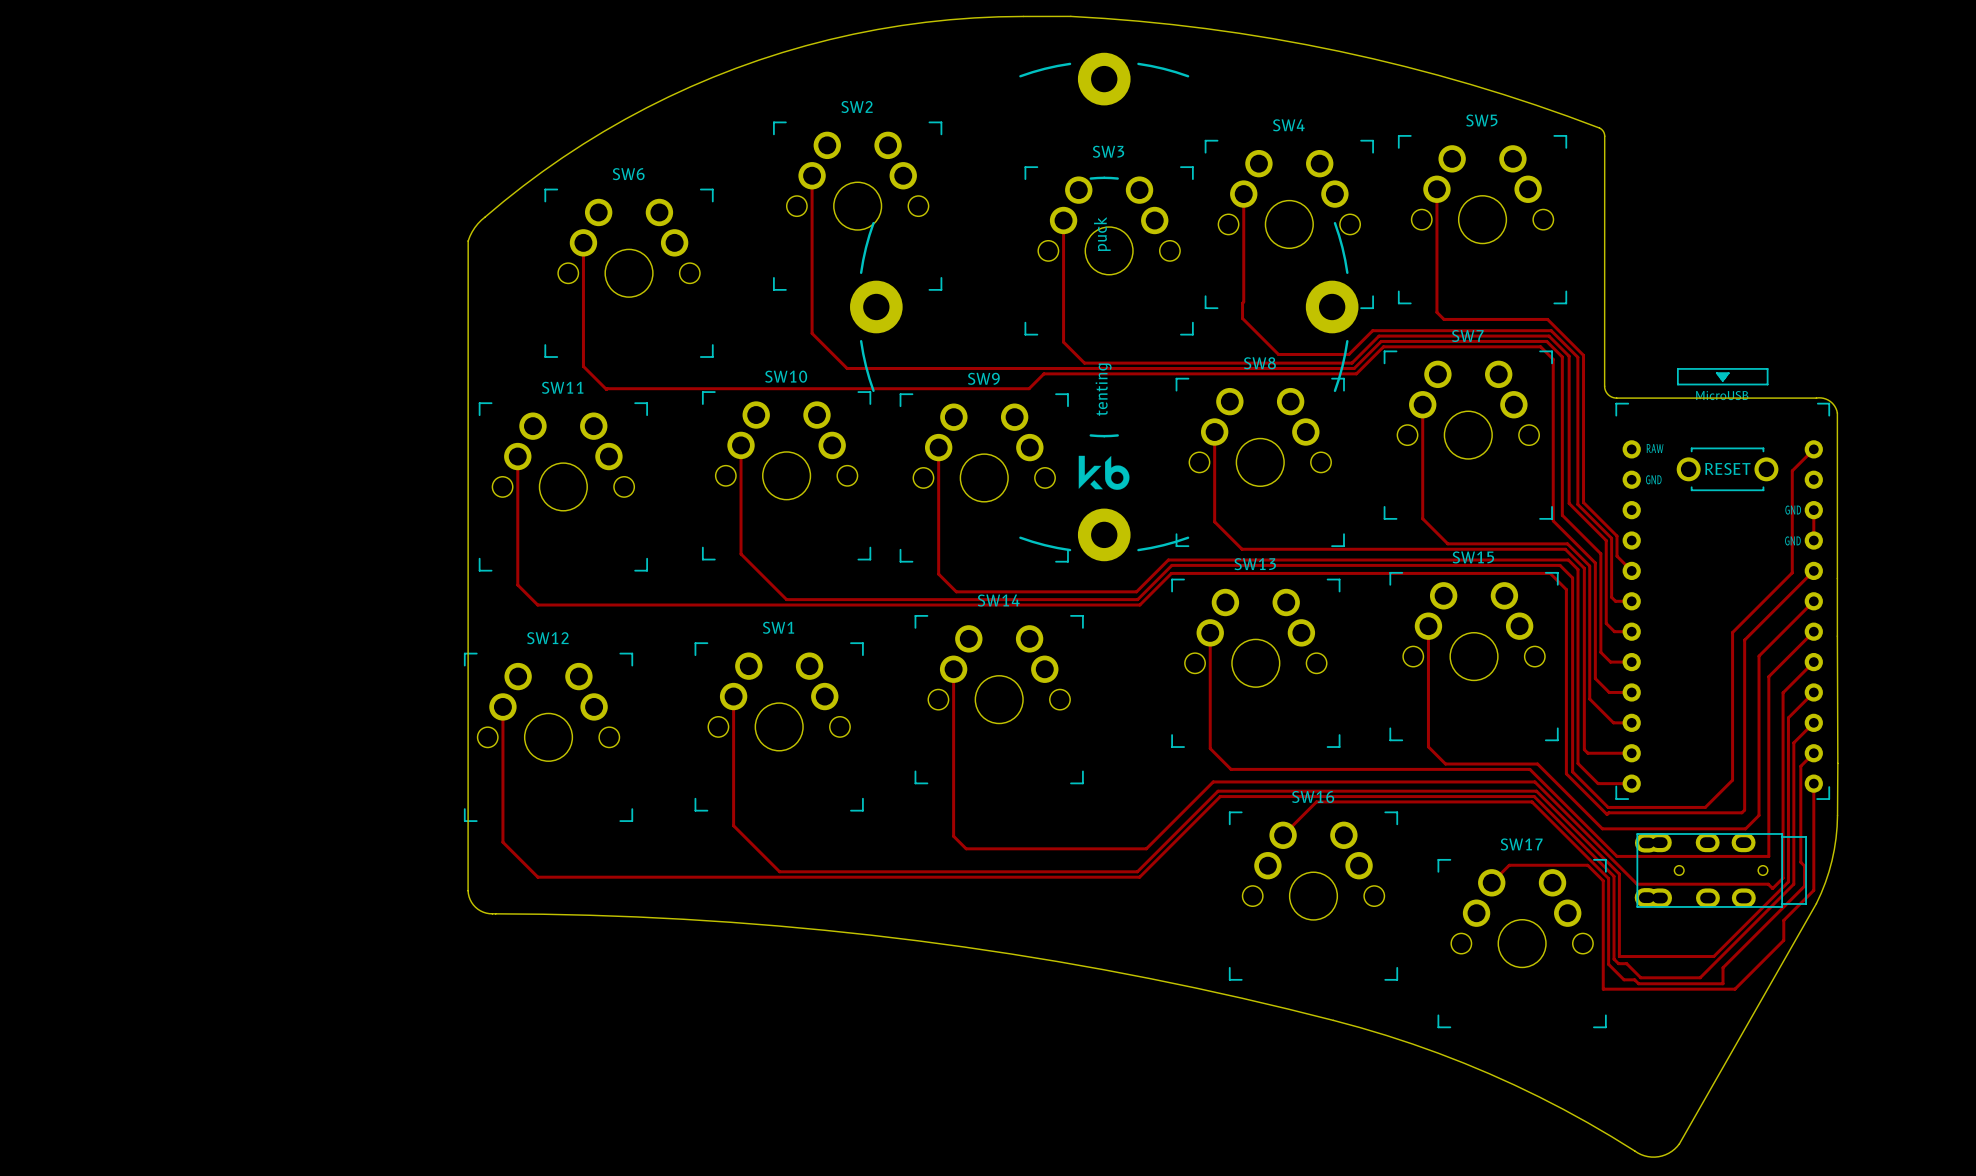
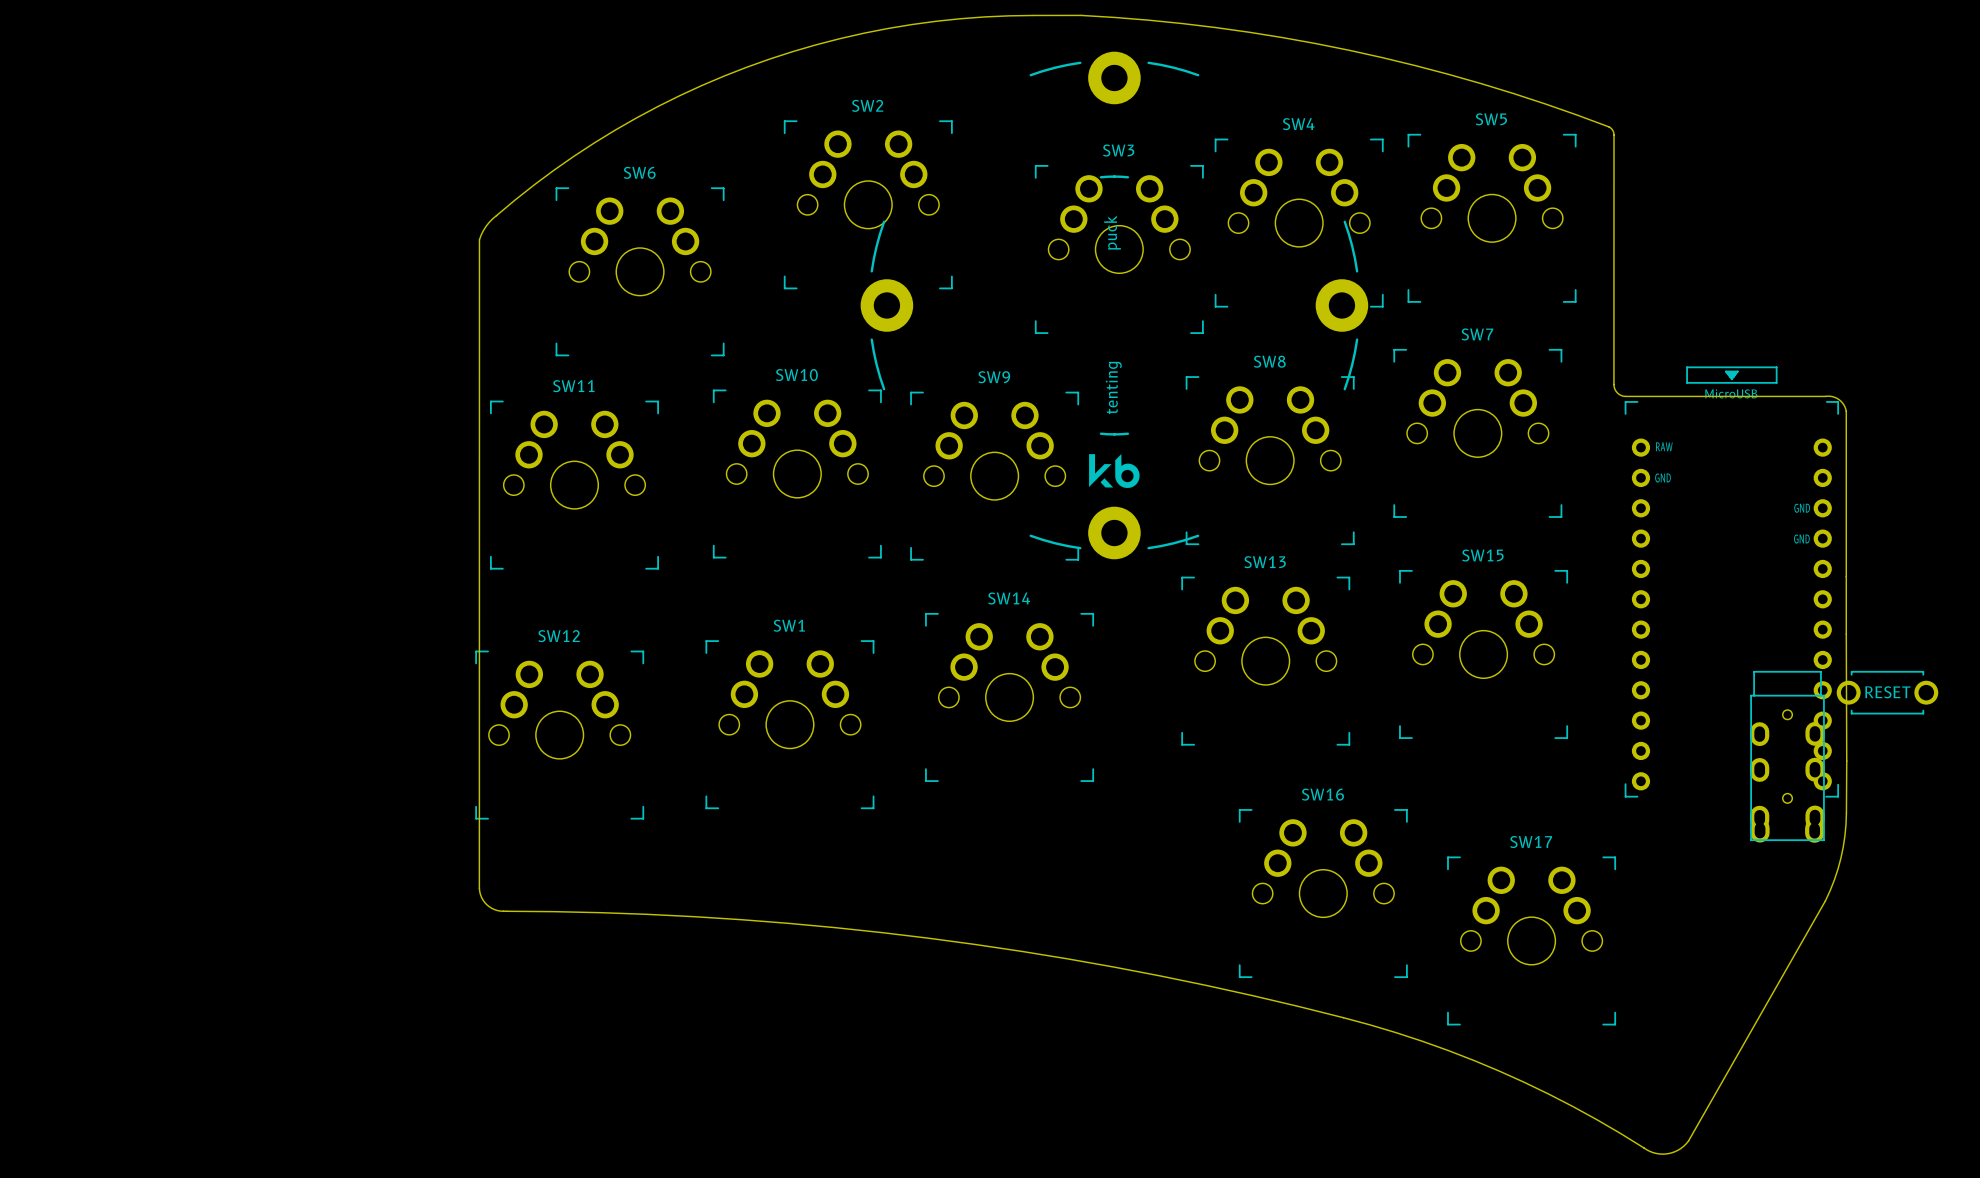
track: (812, 175) (812, 333) (847, 368) (1354, 368) (1381, 341) (1546, 341) (1562, 357) (1562, 515) (1600, 553) (1600, 652) (1610, 662) (1631, 662) -> none
track: (1436, 189) (1436, 312) (1444, 319) (1547, 319) (1583, 355) (1583, 502) (1617, 536) (1617, 556) (1631, 570) -> none
track: (1243, 194) (1242, 318) (1278, 354) (1348, 354) (1372, 330) (1551, 330) (1577, 357) (1577, 504) (1611, 538) (1611, 597) (1615, 601) (1631, 601) -> none
track: (1063, 220) (1063, 342) (1084, 363) (1351, 363) (1379, 336) (1549, 336) (1569, 356) (1569, 503) (1606, 540) (1606, 623) (1614, 631) (1631, 631) -> none
track: (583, 242) (583, 366) (606, 389) (1029, 388) (1043, 373) (1356, 373) (1383, 346) (1540, 346) (1553, 359) (1553, 520) (1595, 563) (1595, 678) (1609, 692) (1631, 692) -> none
track: (1422, 404) (1422, 518) (1447, 543) (1567, 543) (1589, 566) (1589, 699) (1613, 722) (1631, 722) -> none
track: (1214, 432) (1214, 521) (1242, 549) (1565, 549) (1584, 568) (1584, 749) (1587, 753) (1631, 753) -> none
track: (741, 445) (741, 554) (786, 599) (1137, 599) (1171, 565) (1560, 565) (1572, 577) (1572, 771) (1608, 807) (1705, 807) (1732, 780) (1732, 632) (1792, 572) (1792, 470) (1813, 449) -> none
track: (938, 447) (938, 574) (956, 591) (1136, 591) (1168, 560) (1568, 560) (1578, 569) (1578, 763) (1598, 783) (1631, 783) -> none
track: (517, 456) (517, 585) (537, 605) (1139, 605) (1171, 573) (1550, 573) (1566, 589) (1566, 773) (1607, 814) (1608, 812) (1741, 812) (1744, 810) (1744, 640) (1813, 570) -> none
part position: (1727, 469) -> (1887, 692)
track: (1813, 510) (1813, 540) -> none
track: (1813, 601) (1759, 656) (1759, 815) (1745, 828) (1602, 828) (1537, 764) (1445, 764) (1428, 746) (1428, 626) -> none
track: (1813, 631) (1768, 676) (1768, 856) (1616, 856) (1529, 769) (1231, 769) (1210, 748) (1210, 632) -> none
track: (1813, 662) (1783, 692) (1783, 878) (1772, 888) (1768, 884) (1637, 884) (1534, 781) (1213, 781) (1146, 848) (966, 848) (953, 836) (953, 669) -> none
track: (1813, 692) (1788, 717) (1788, 881) (1713, 956) (1619, 956) (1619, 874) (1536, 791) (1218, 791) (1137, 871) (779, 871) (733, 825) (733, 696) -> none
track: (502, 706) (502, 842) (537, 877) (1139, 877) (1220, 796) (1534, 796) (1614, 876) (1614, 959) (1618, 963) (1626, 963) (1640, 977) (1700, 977) (1793, 884) (1793, 742) (1813, 722) -> none
track: (1813, 753) (1800, 766) (1800, 862) (1804, 866) (1804, 886) (1723, 967) (1723, 983) (1638, 983) (1634, 979) (1624, 979) (1608, 964) (1608, 878) (1532, 801) (1316, 801) (1283, 835) -> none
track: (1813, 783) (1813, 890) (1783, 920) (1783, 940) (1734, 989) (1603, 989) (1603, 880) (1587, 865) (1509, 865) (1491, 882) -> none
part rotation: 0° (1720, 870) -> 90° counterclockwise (1787, 756)
part position: (1720, 870) -> (1787, 756)

